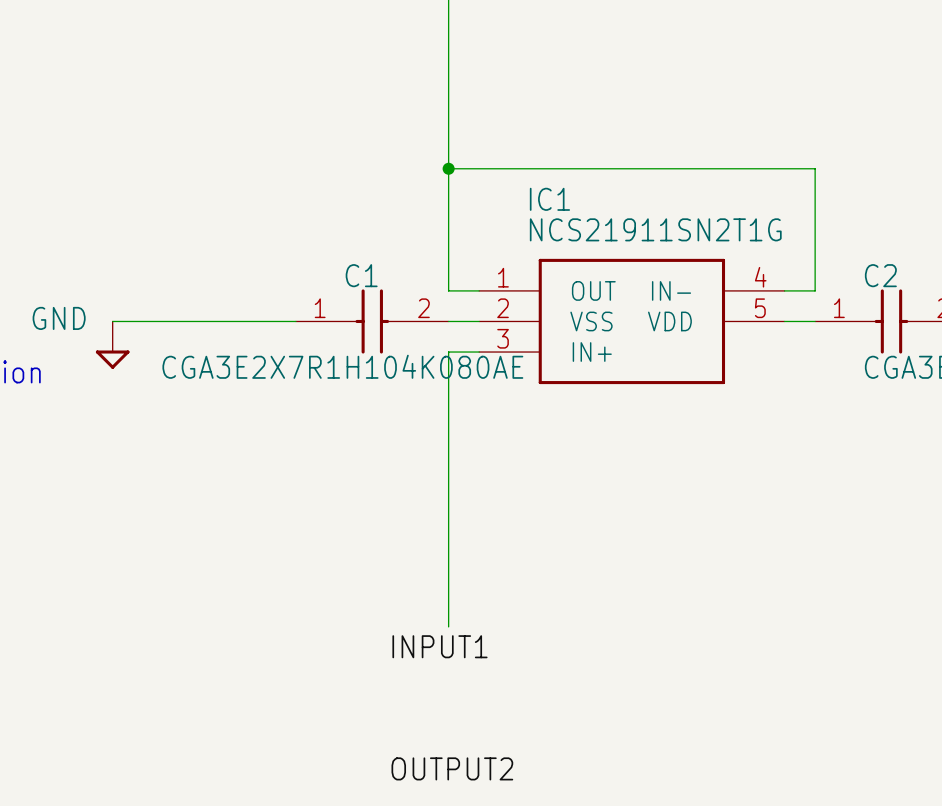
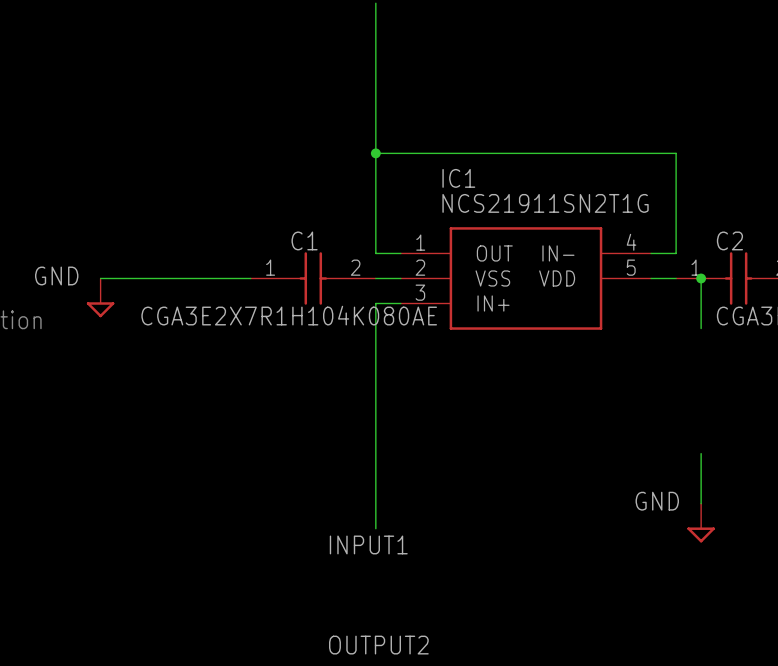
wire: none -> (701, 278) (701, 328)
junction: none -> (701, 278)
wire: none -> (701, 453) (701, 503)
power symbol: none -> GND (701, 523)

